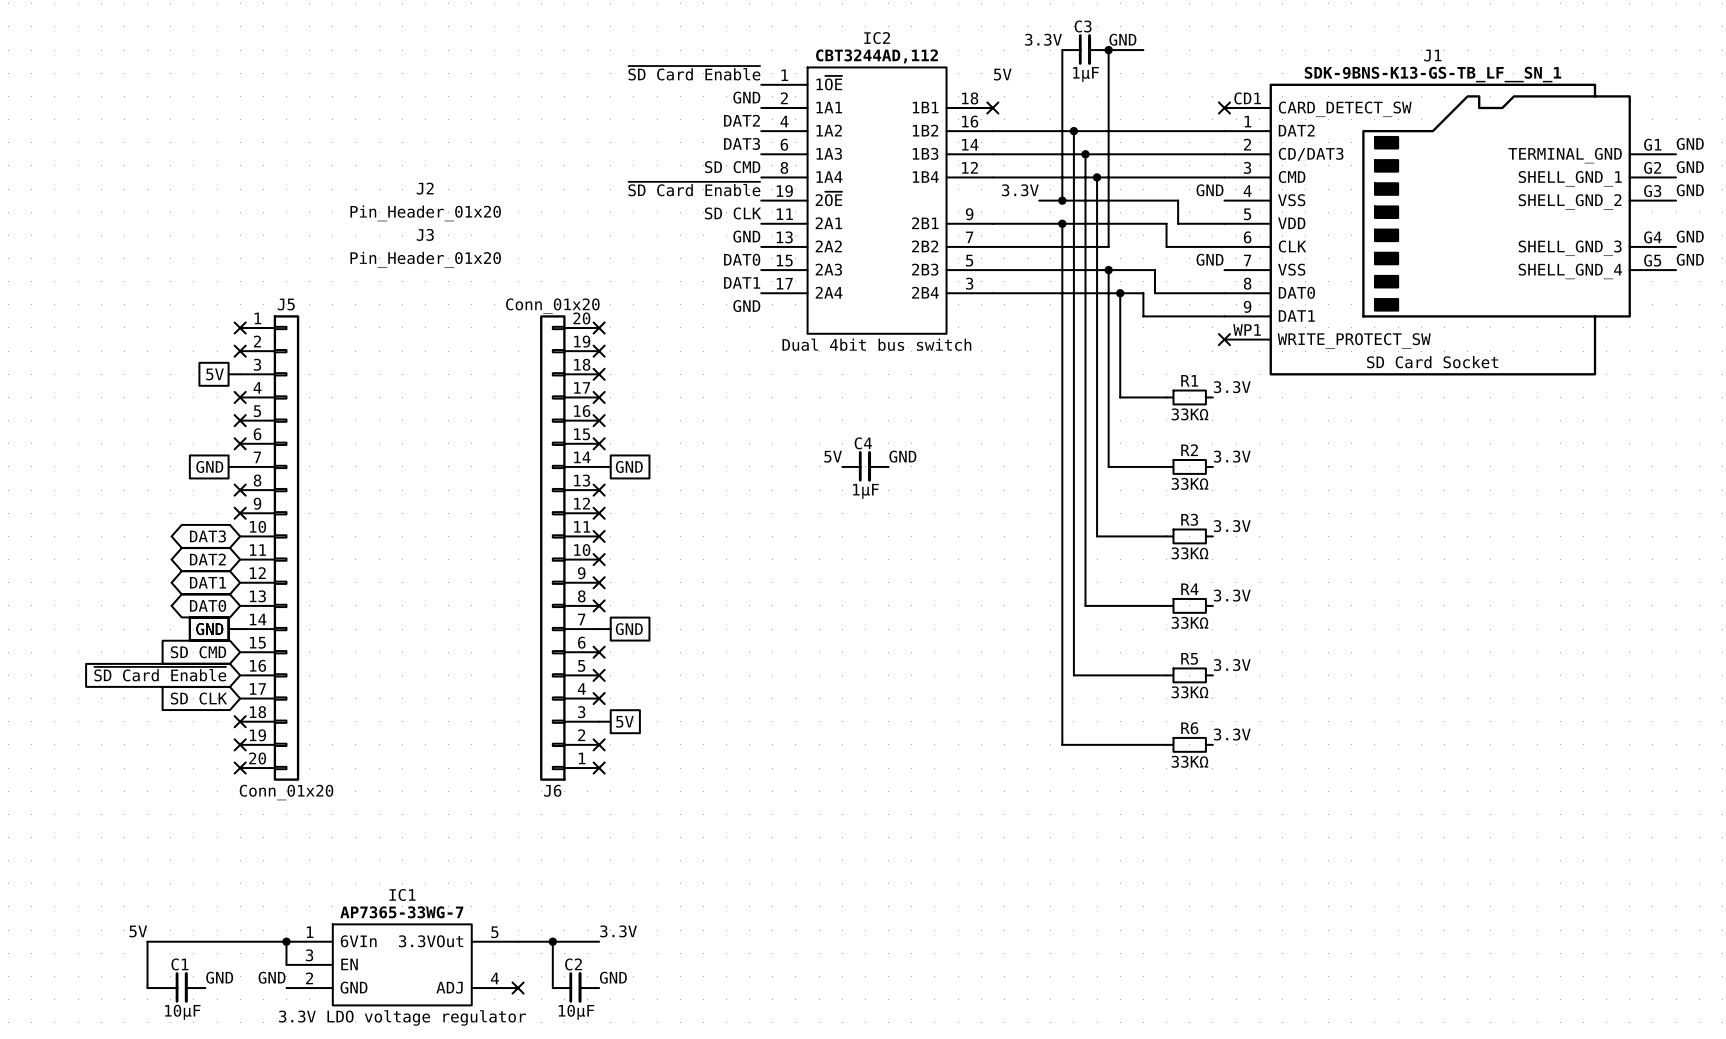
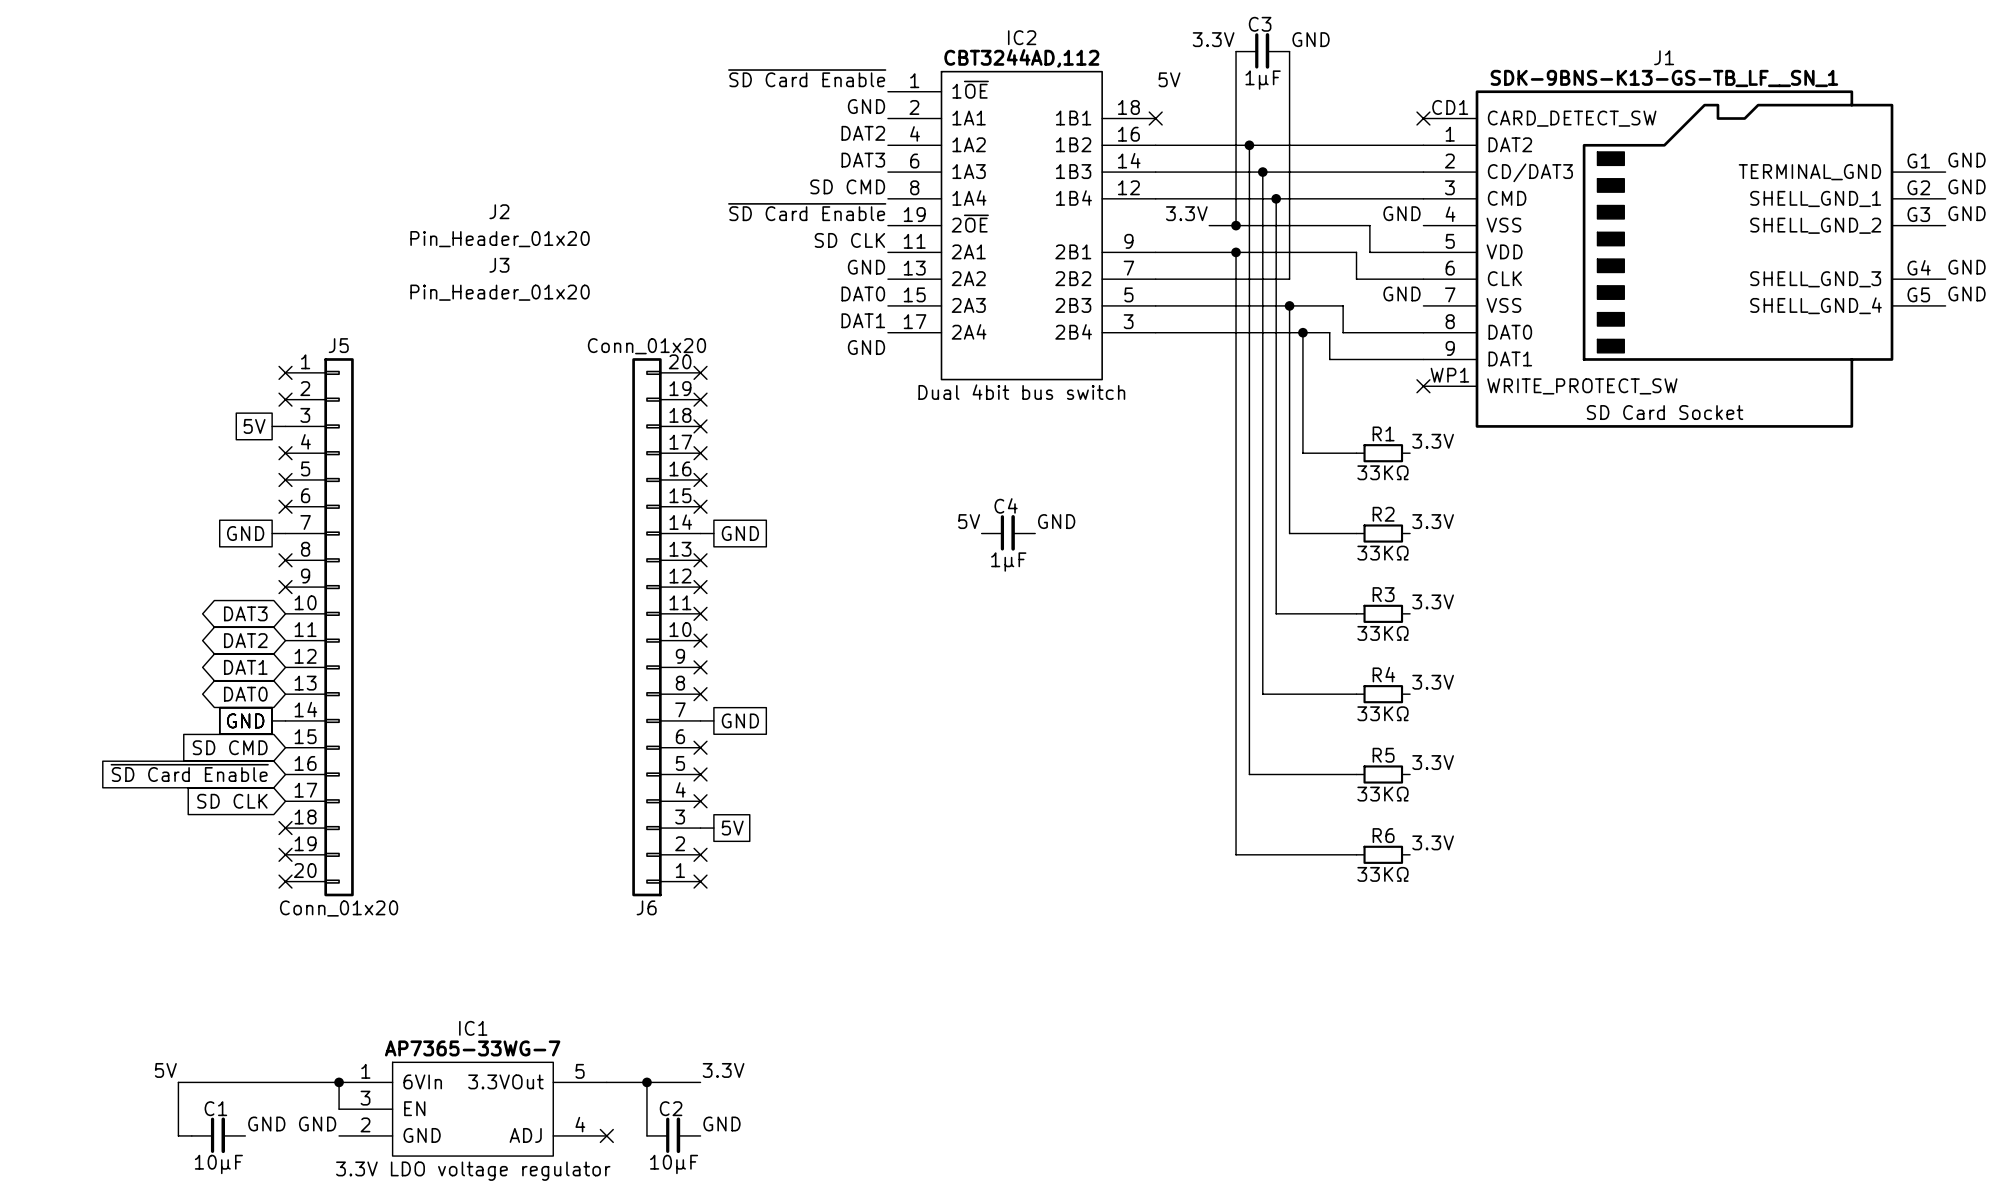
wire: (1108, 50) (1143, 50) -> none
junction: (1108, 50) -> none

